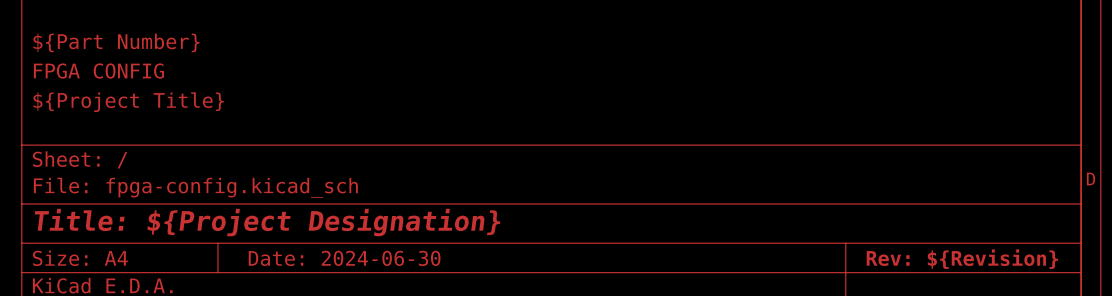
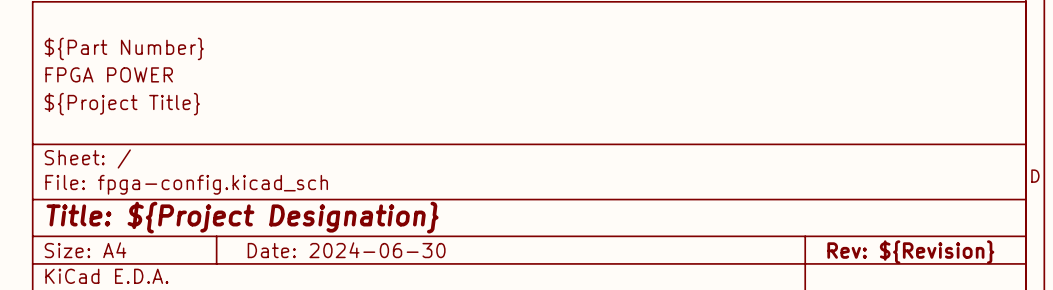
title block: FPGA CONFIG (98, 71) -> FPGA POWER (109, 74)

